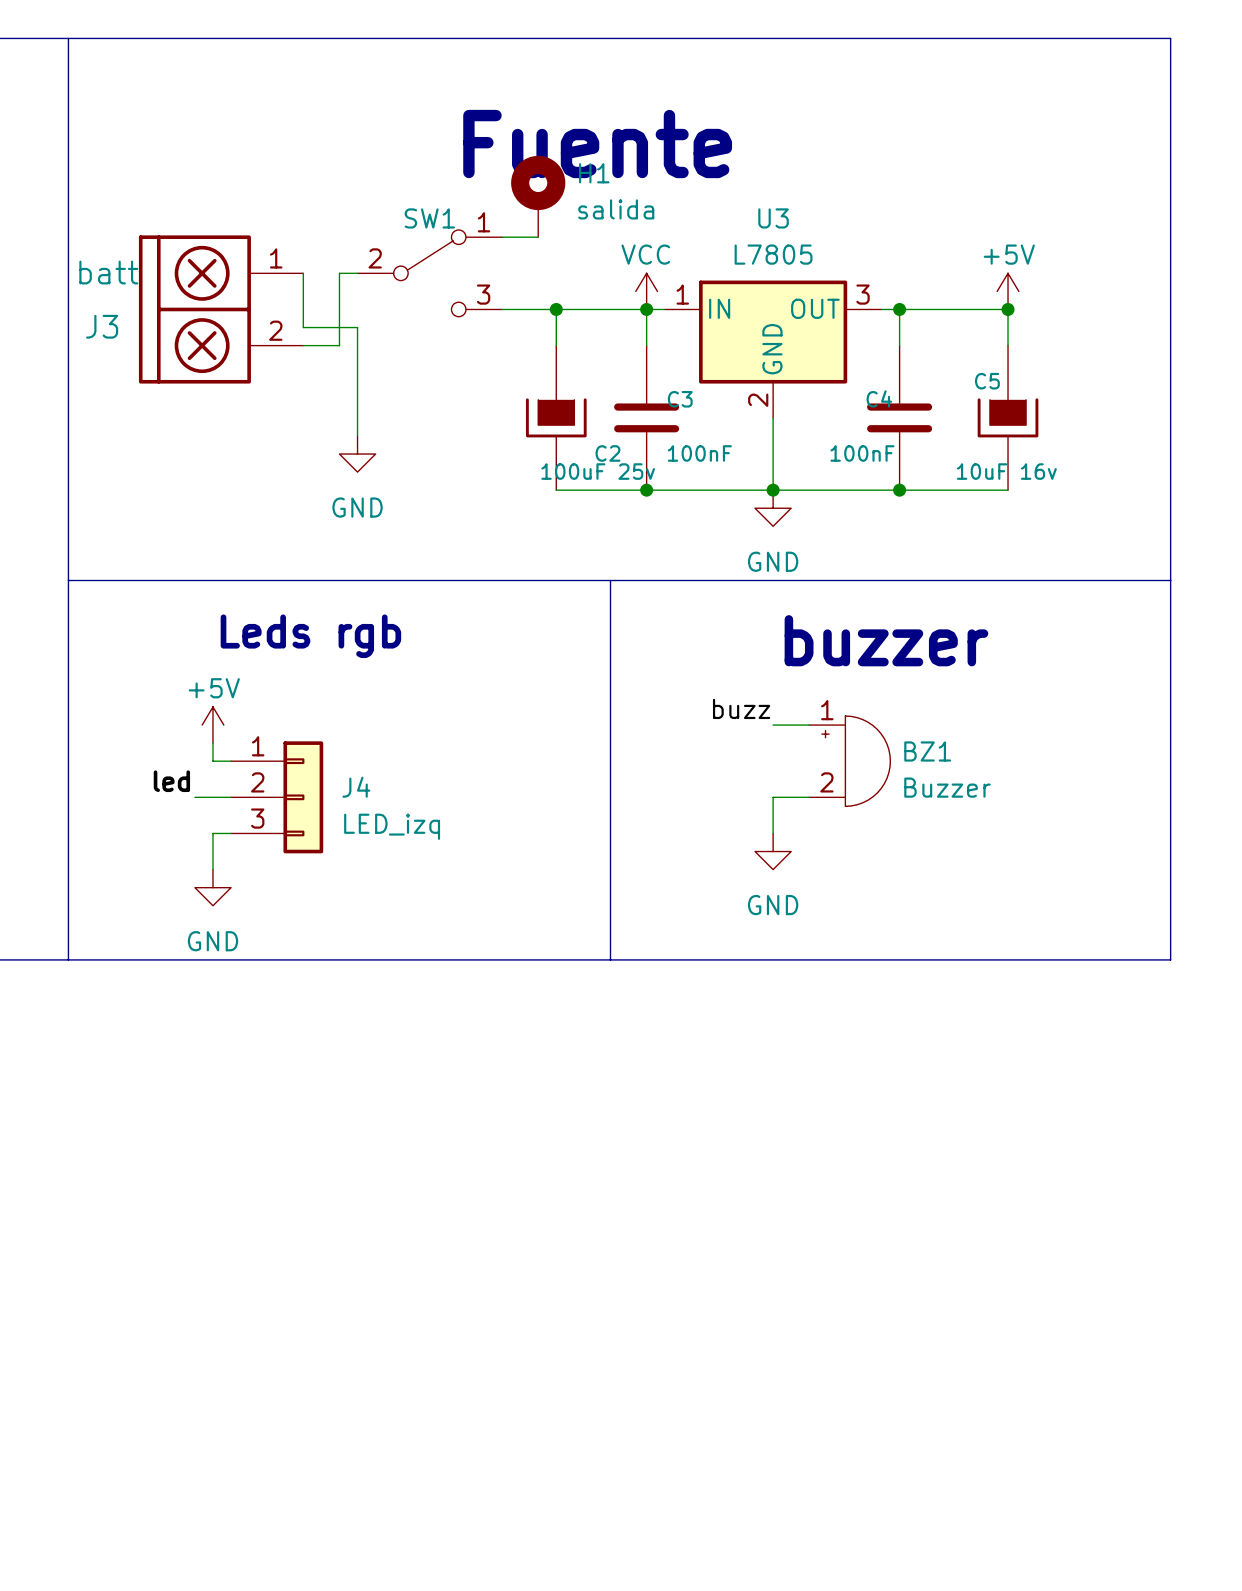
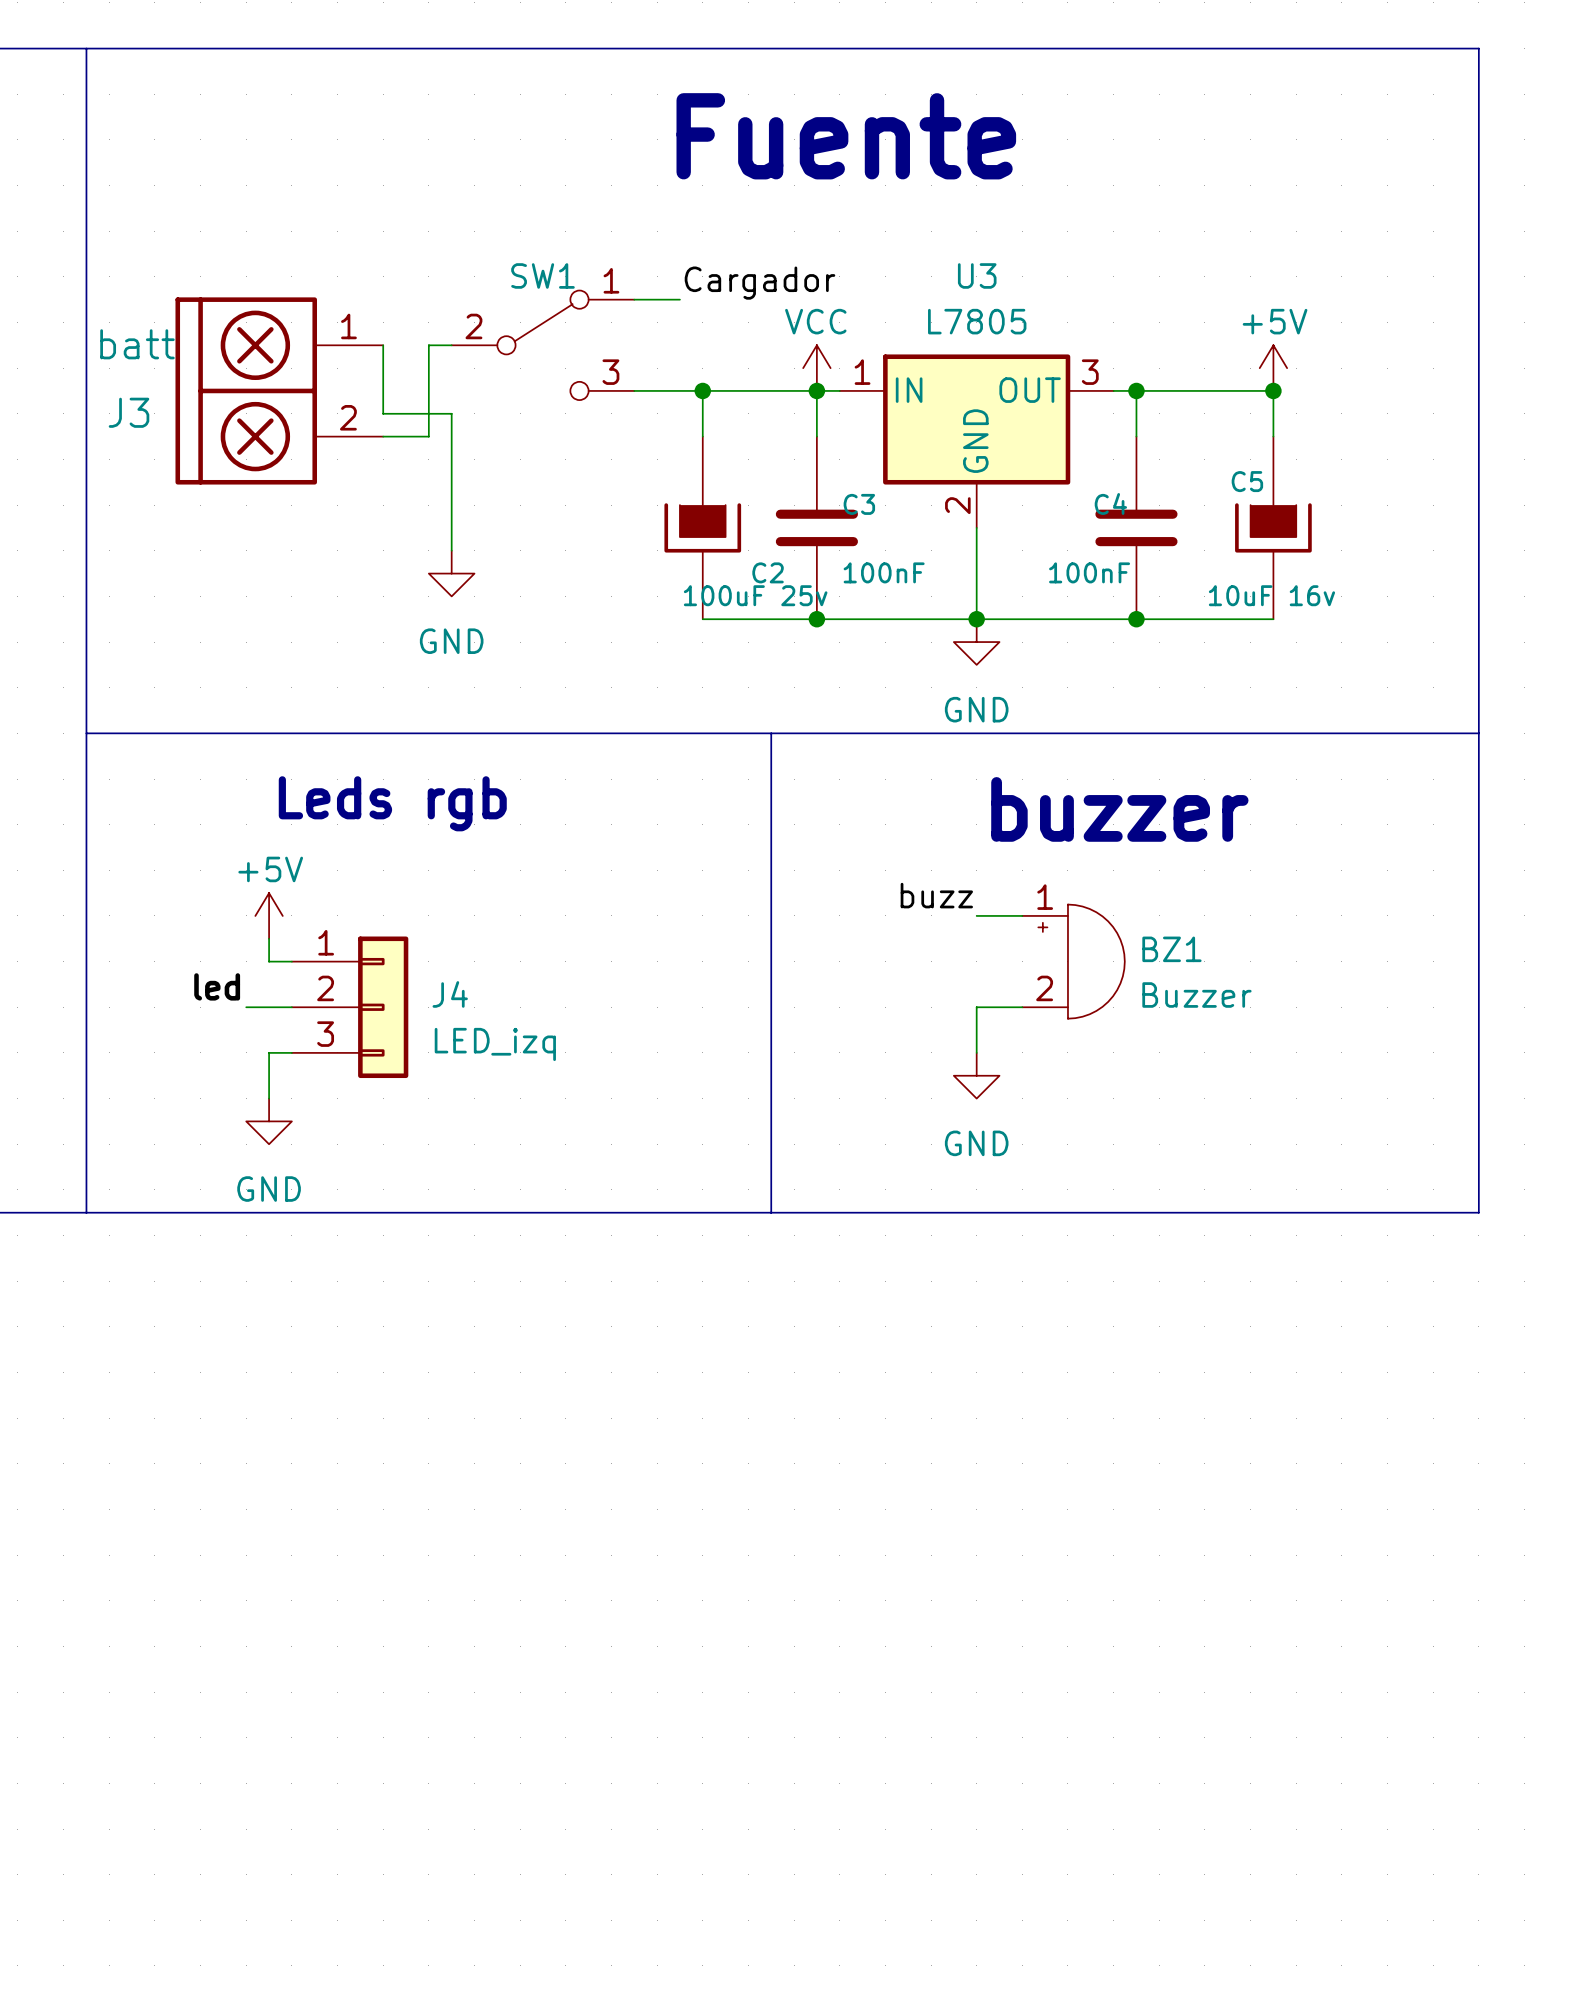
text position: Fuente (597, 144) -> Fuente (846, 136)
H1: salida (538, 196) -> none
label: none -> Cargador (760, 283)

